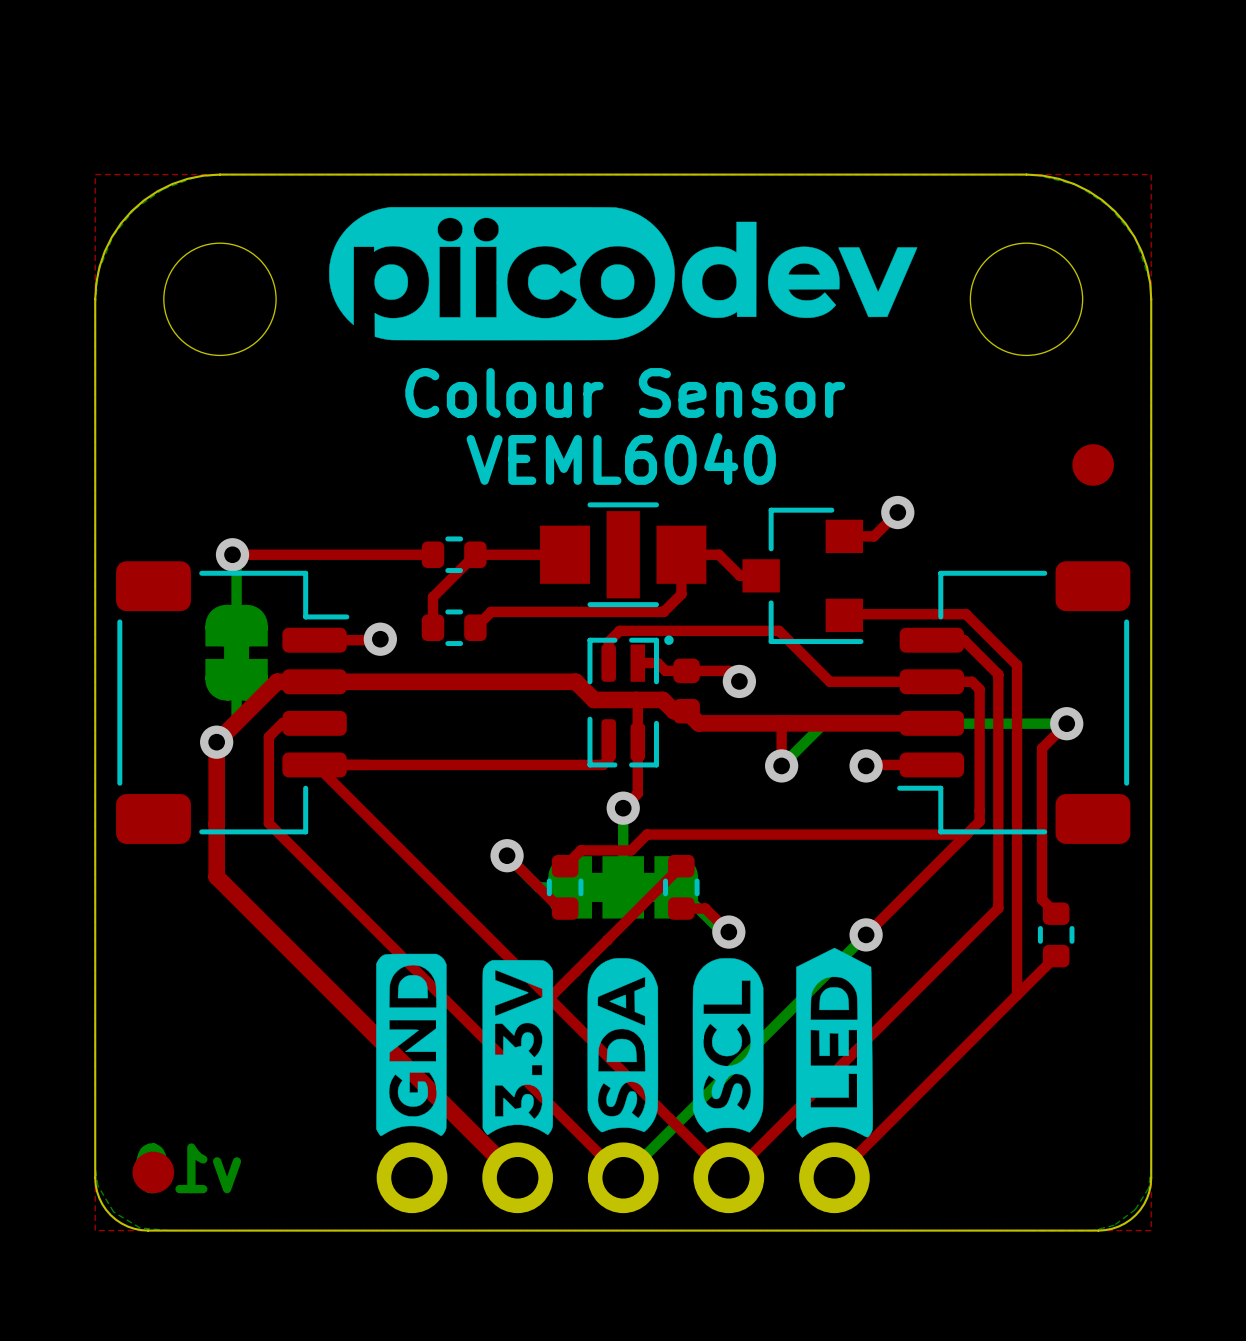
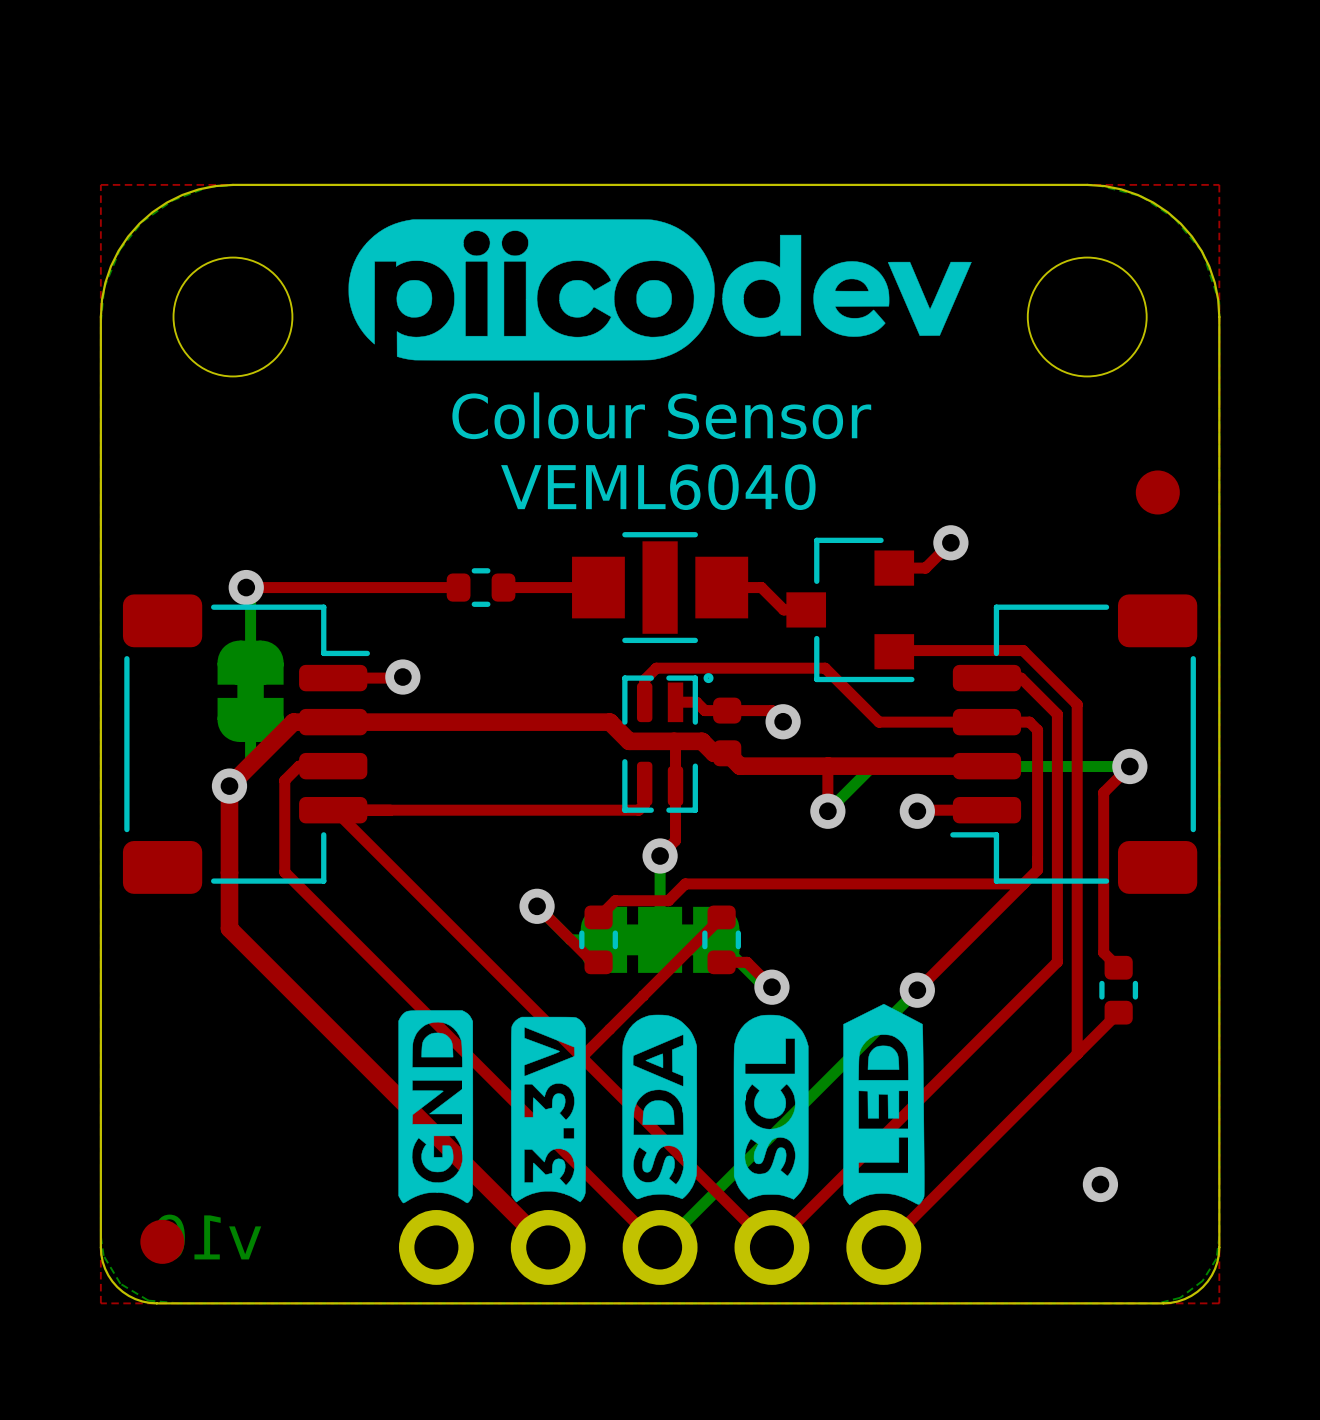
top track: (475, 554) (432, 597) (432, 627) -> none
top track: (681, 554) (681, 594) (663, 611) (491, 611) (475, 627) -> none
part: (454, 627) -> none
via: none -> (1100, 1184)

